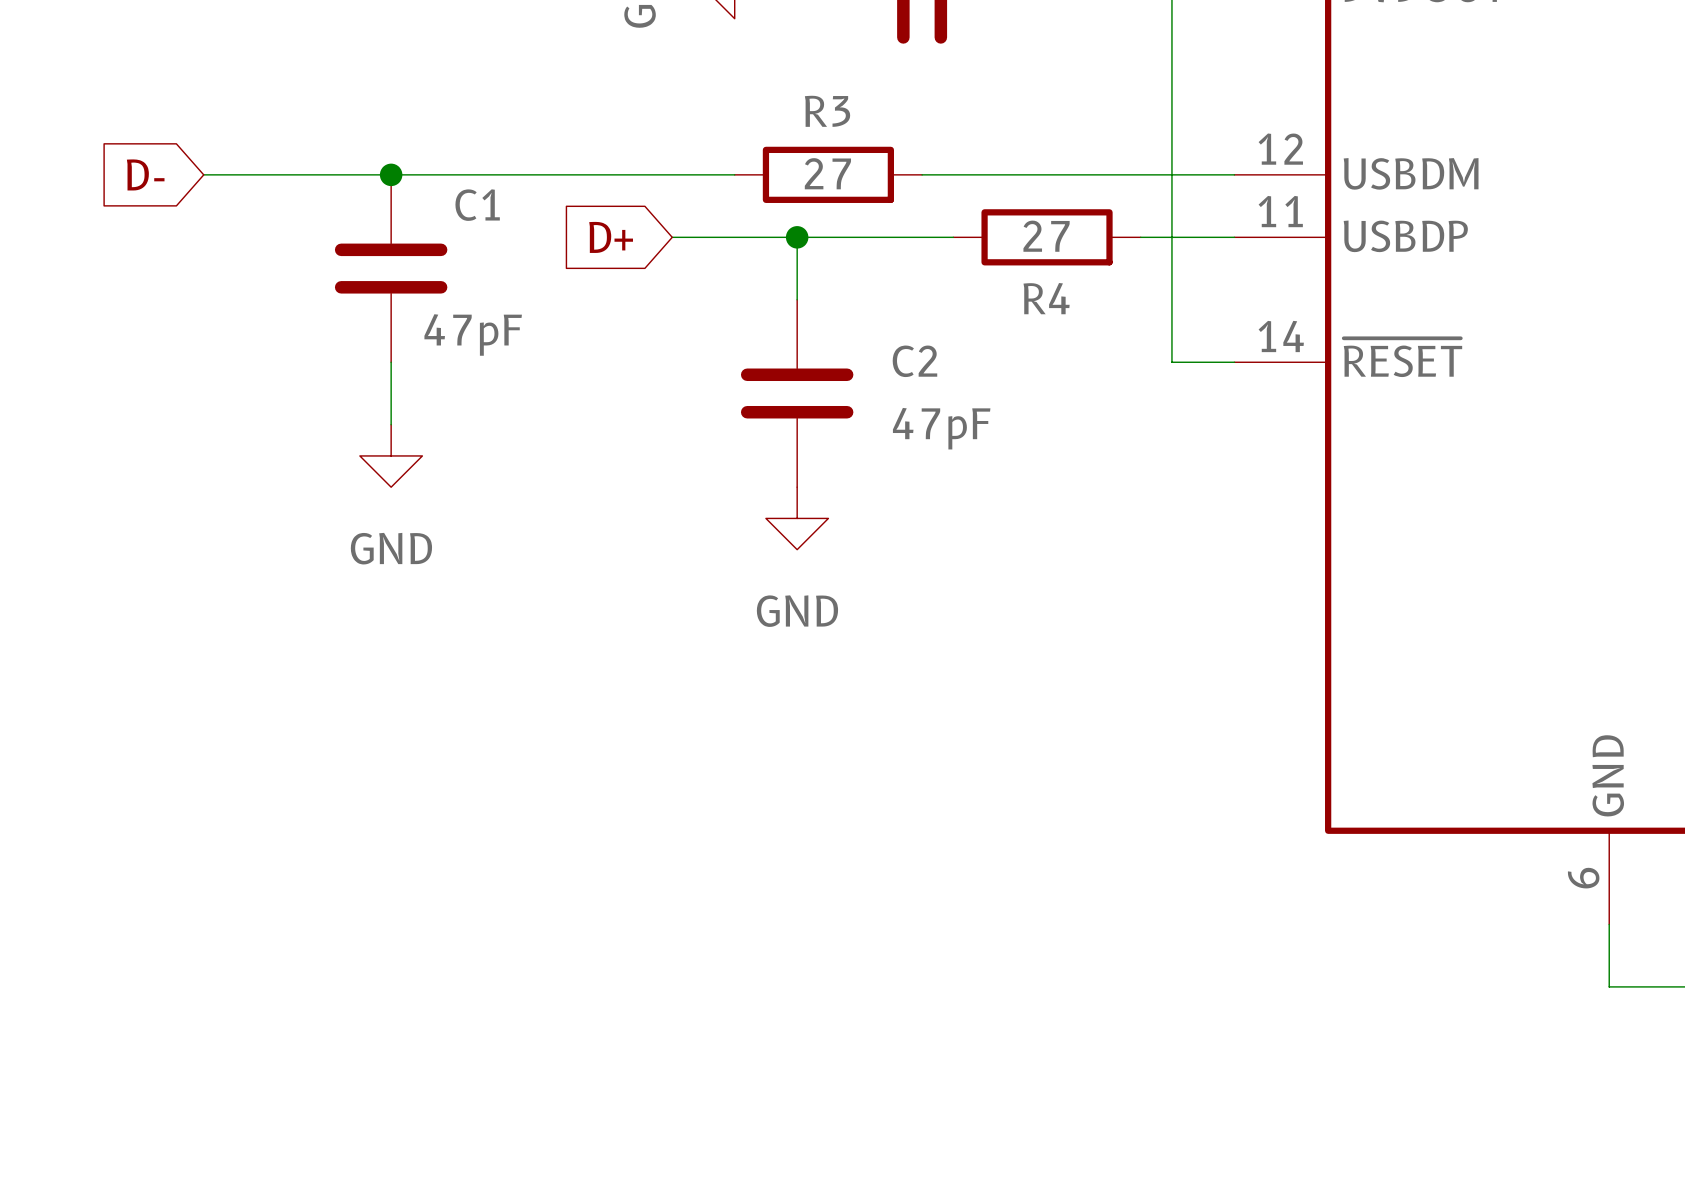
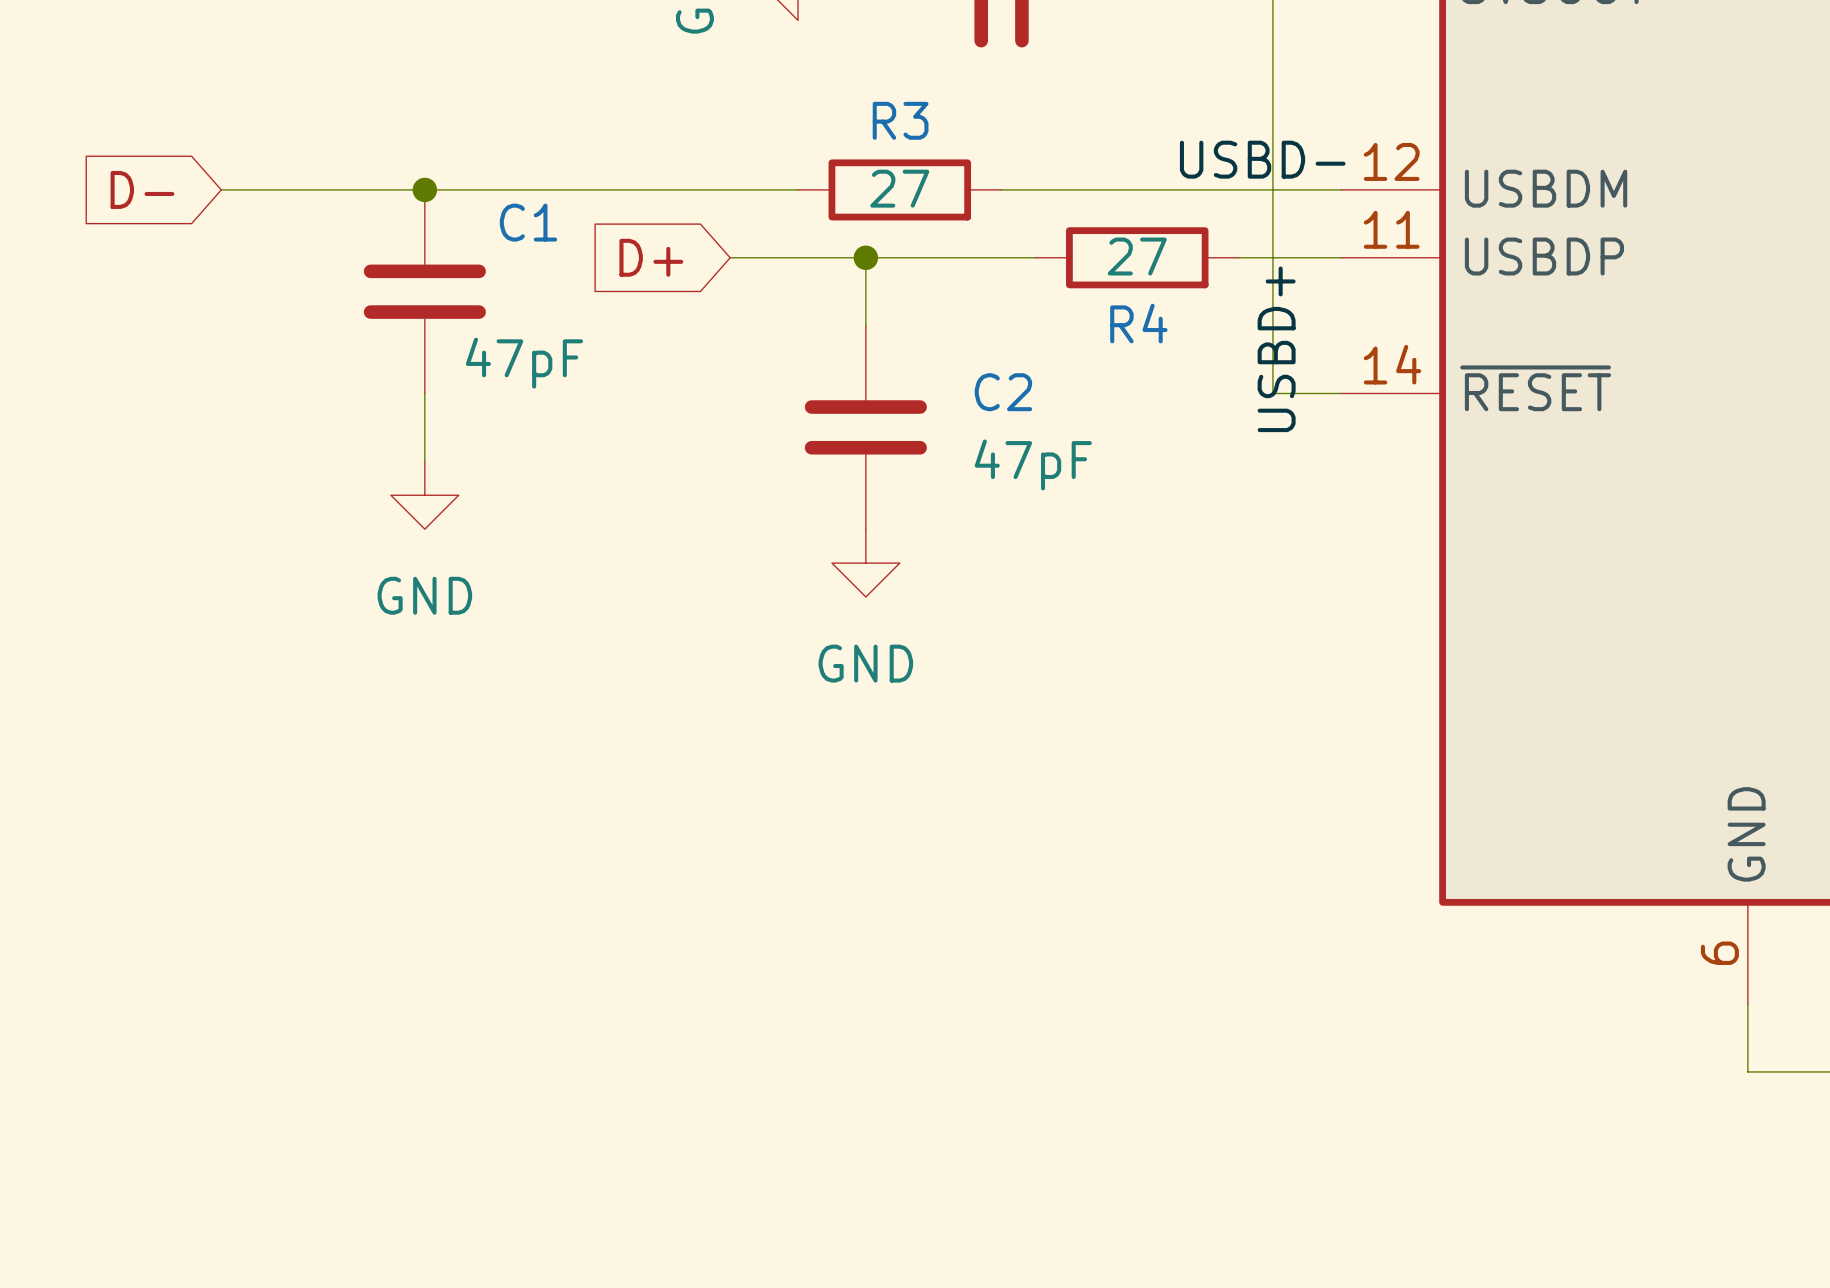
label: none -> USBD- (1262, 159)
label: none -> USBD+ (1276, 349)

